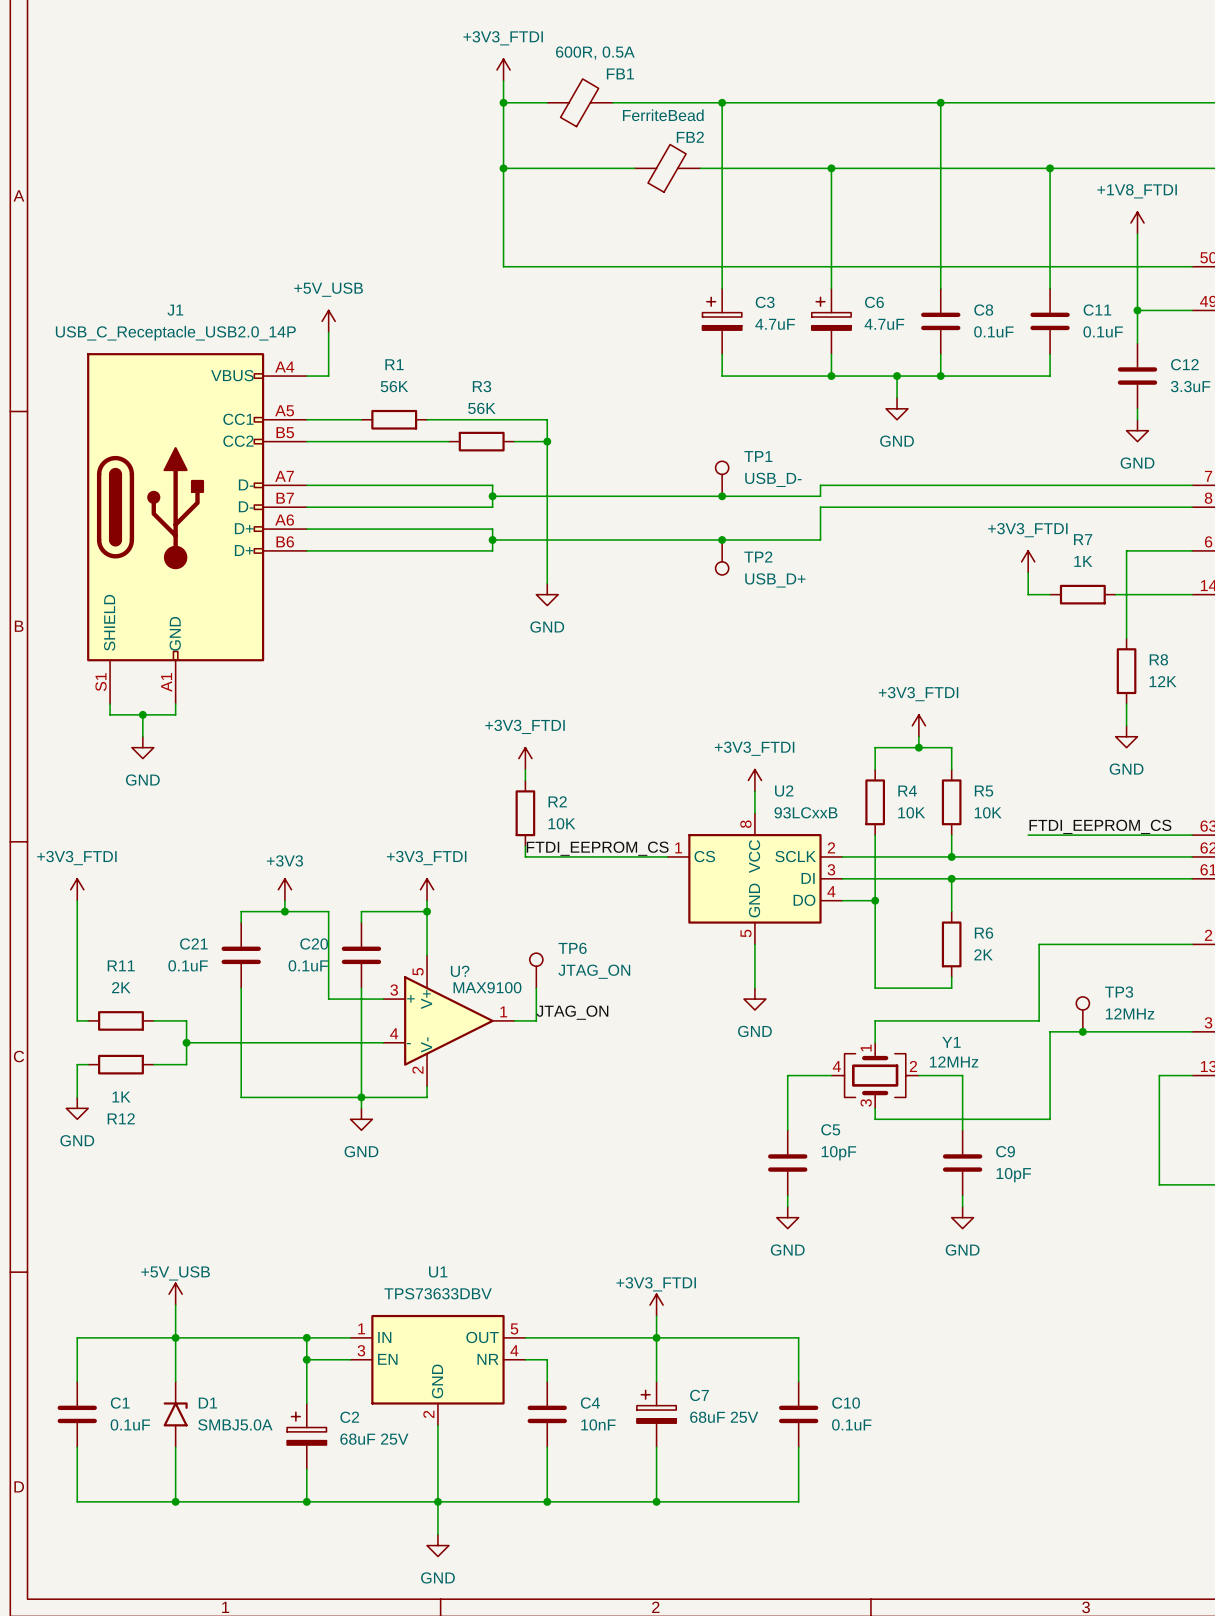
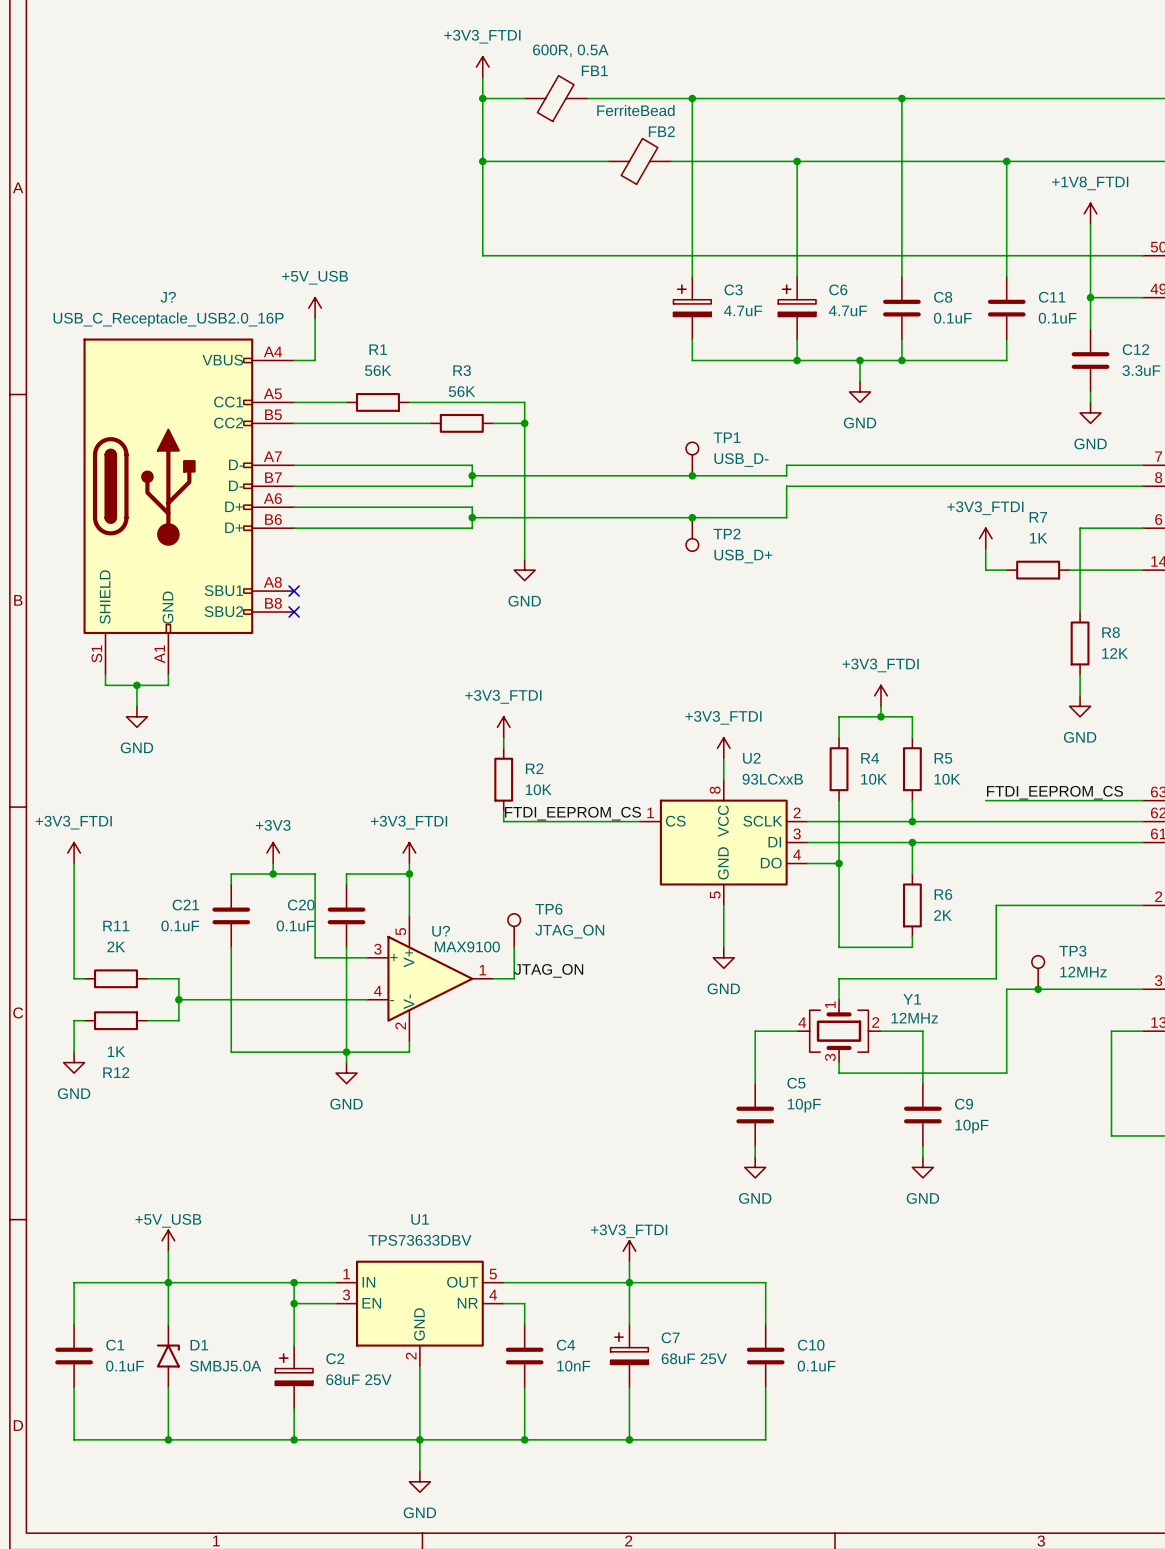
J1: USB_C_Receptacle_USB2.0_14P (196, 528) -> none
J?: none -> USB_C_Receptacle_USB2.0_16P (188, 506)
no-connect mark: none -> (294, 591)
no-connect mark: none -> (294, 612)

